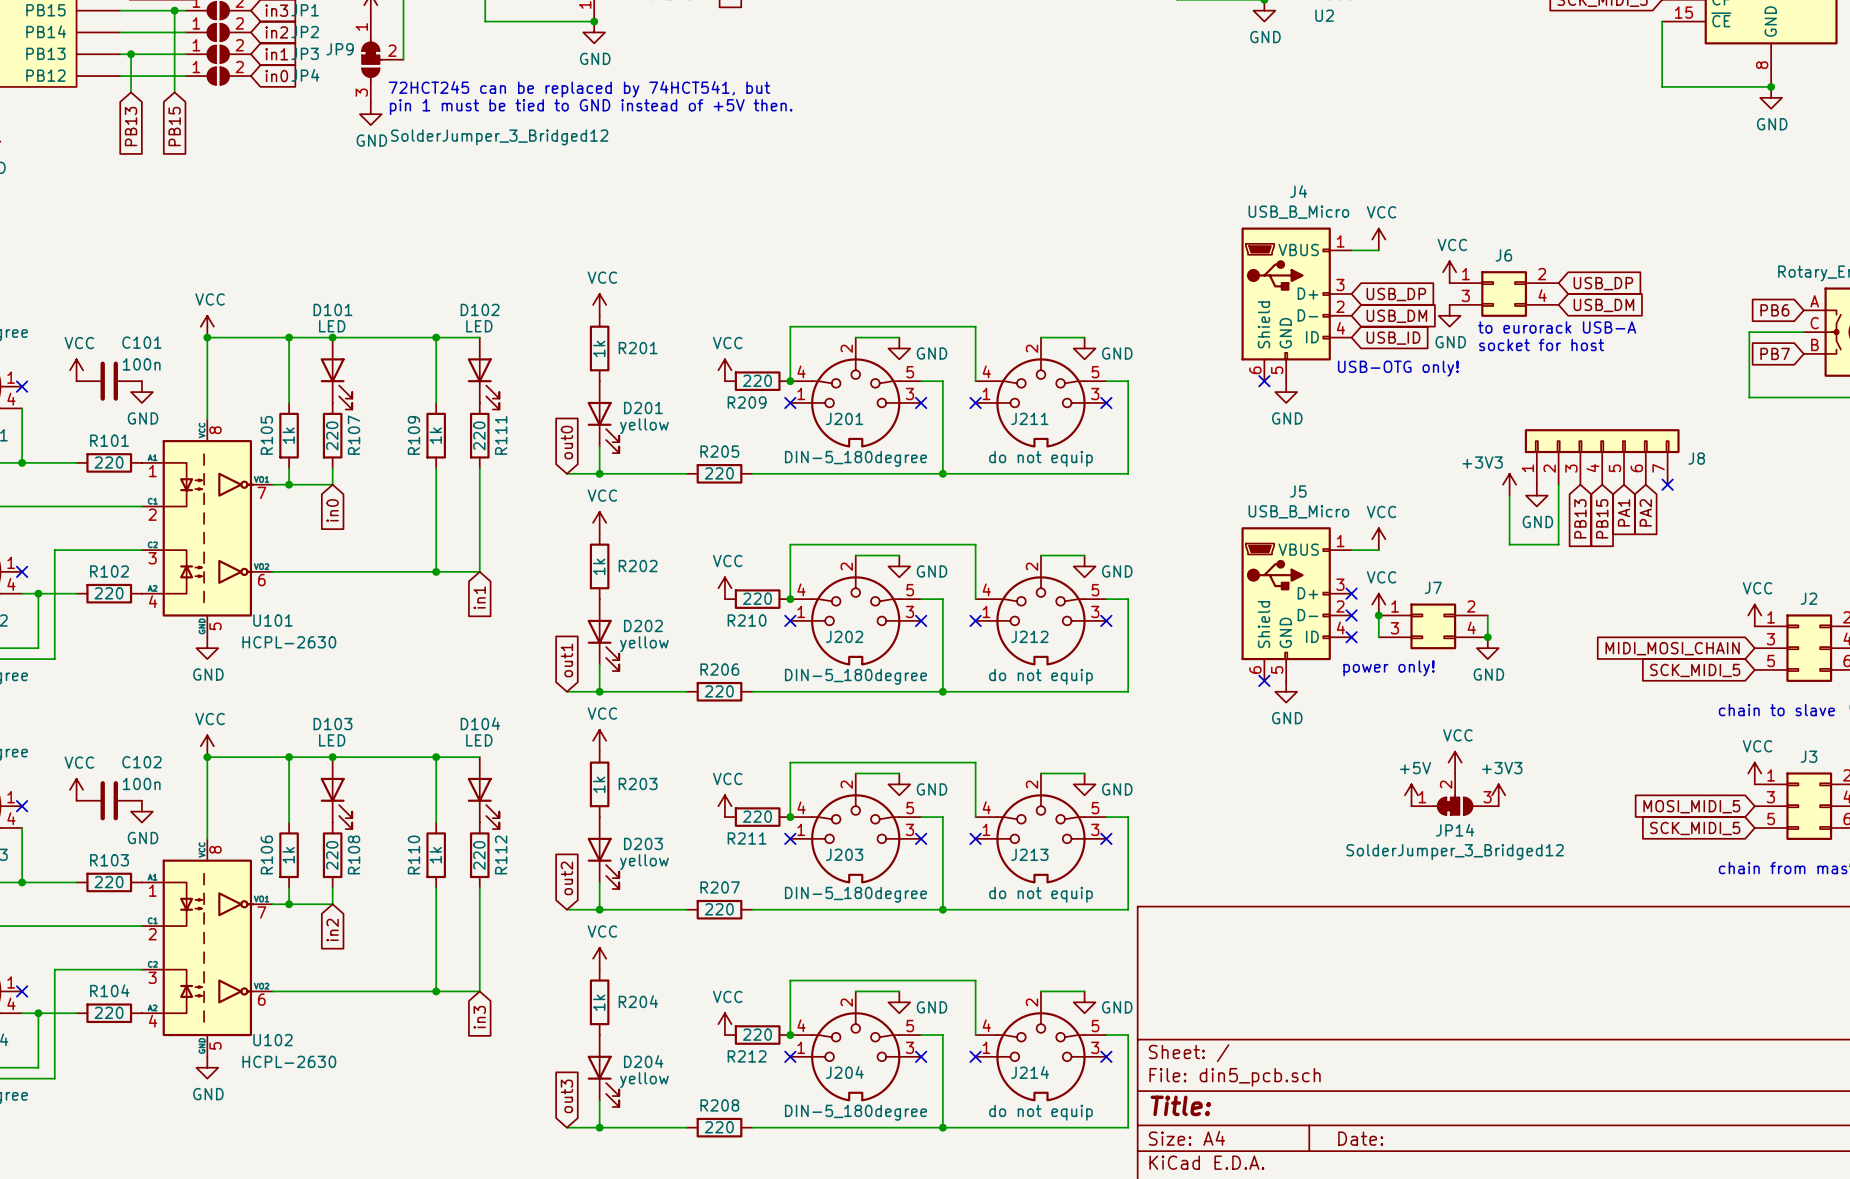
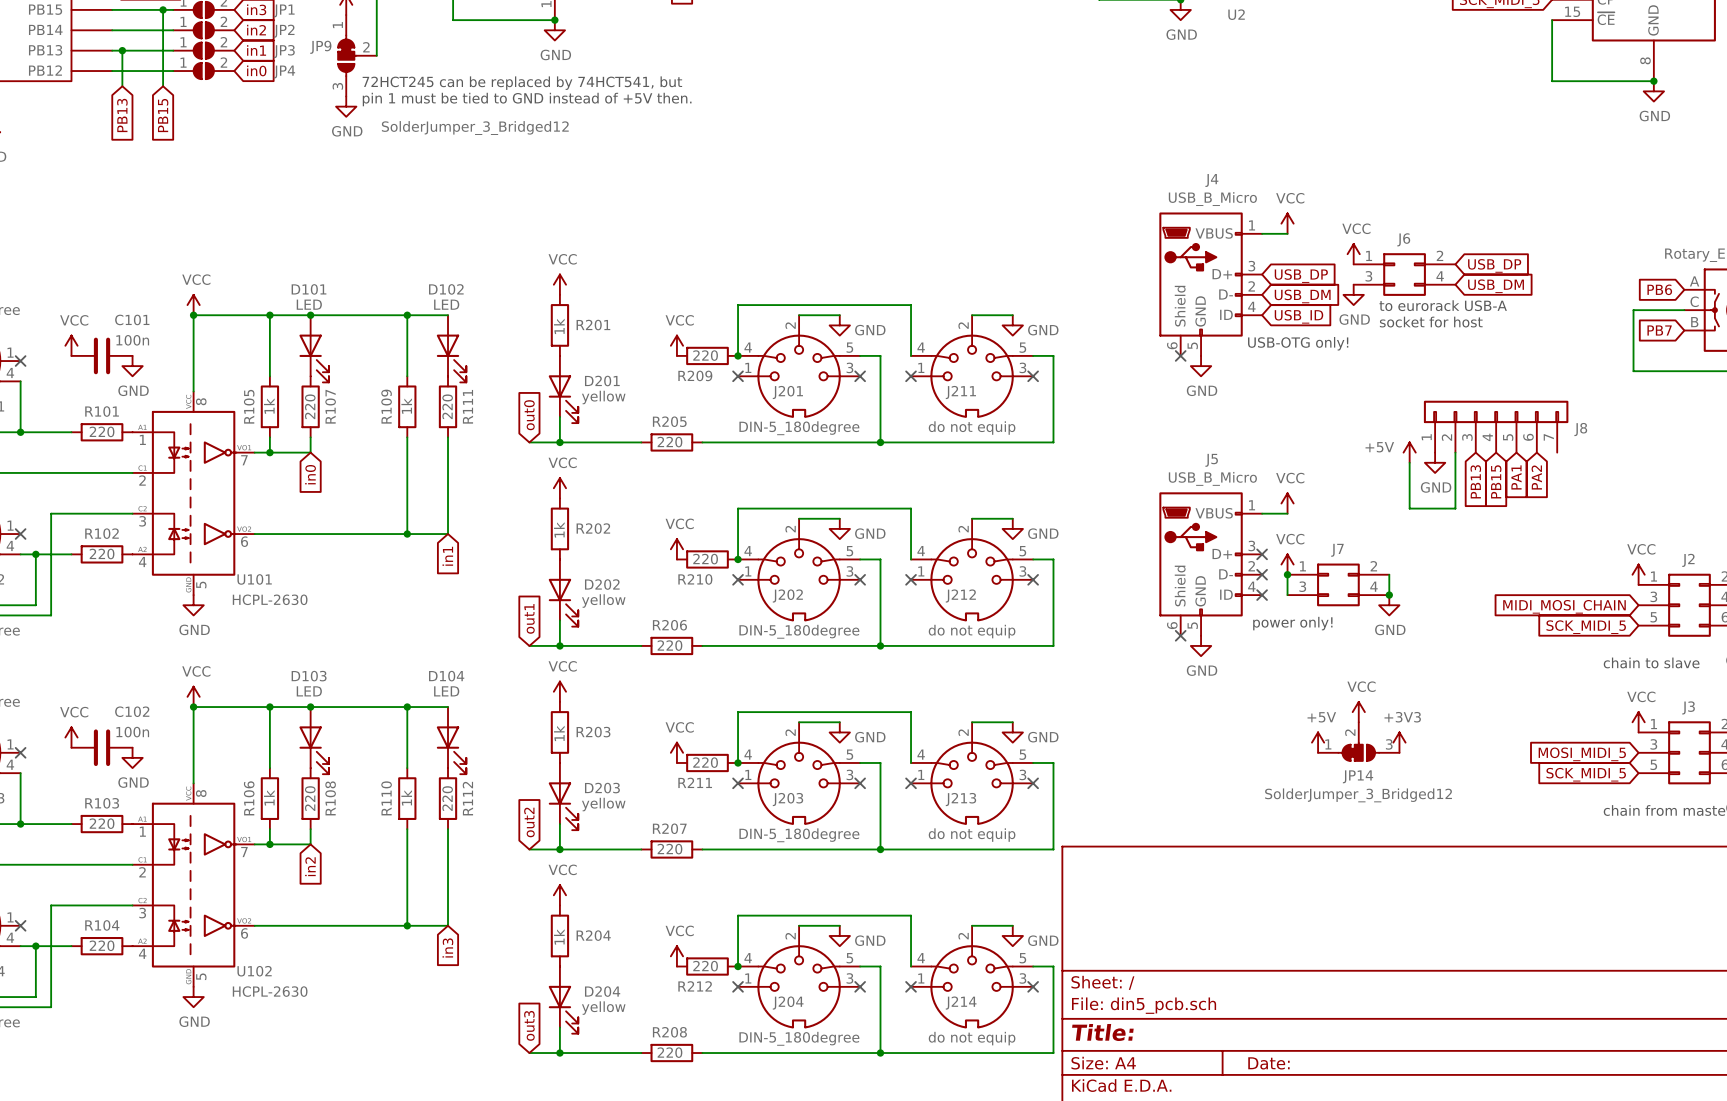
power symbol: +3V3 (1509, 484) -> +5V (1409, 452)
no-connect mark: (1667, 484) -> none

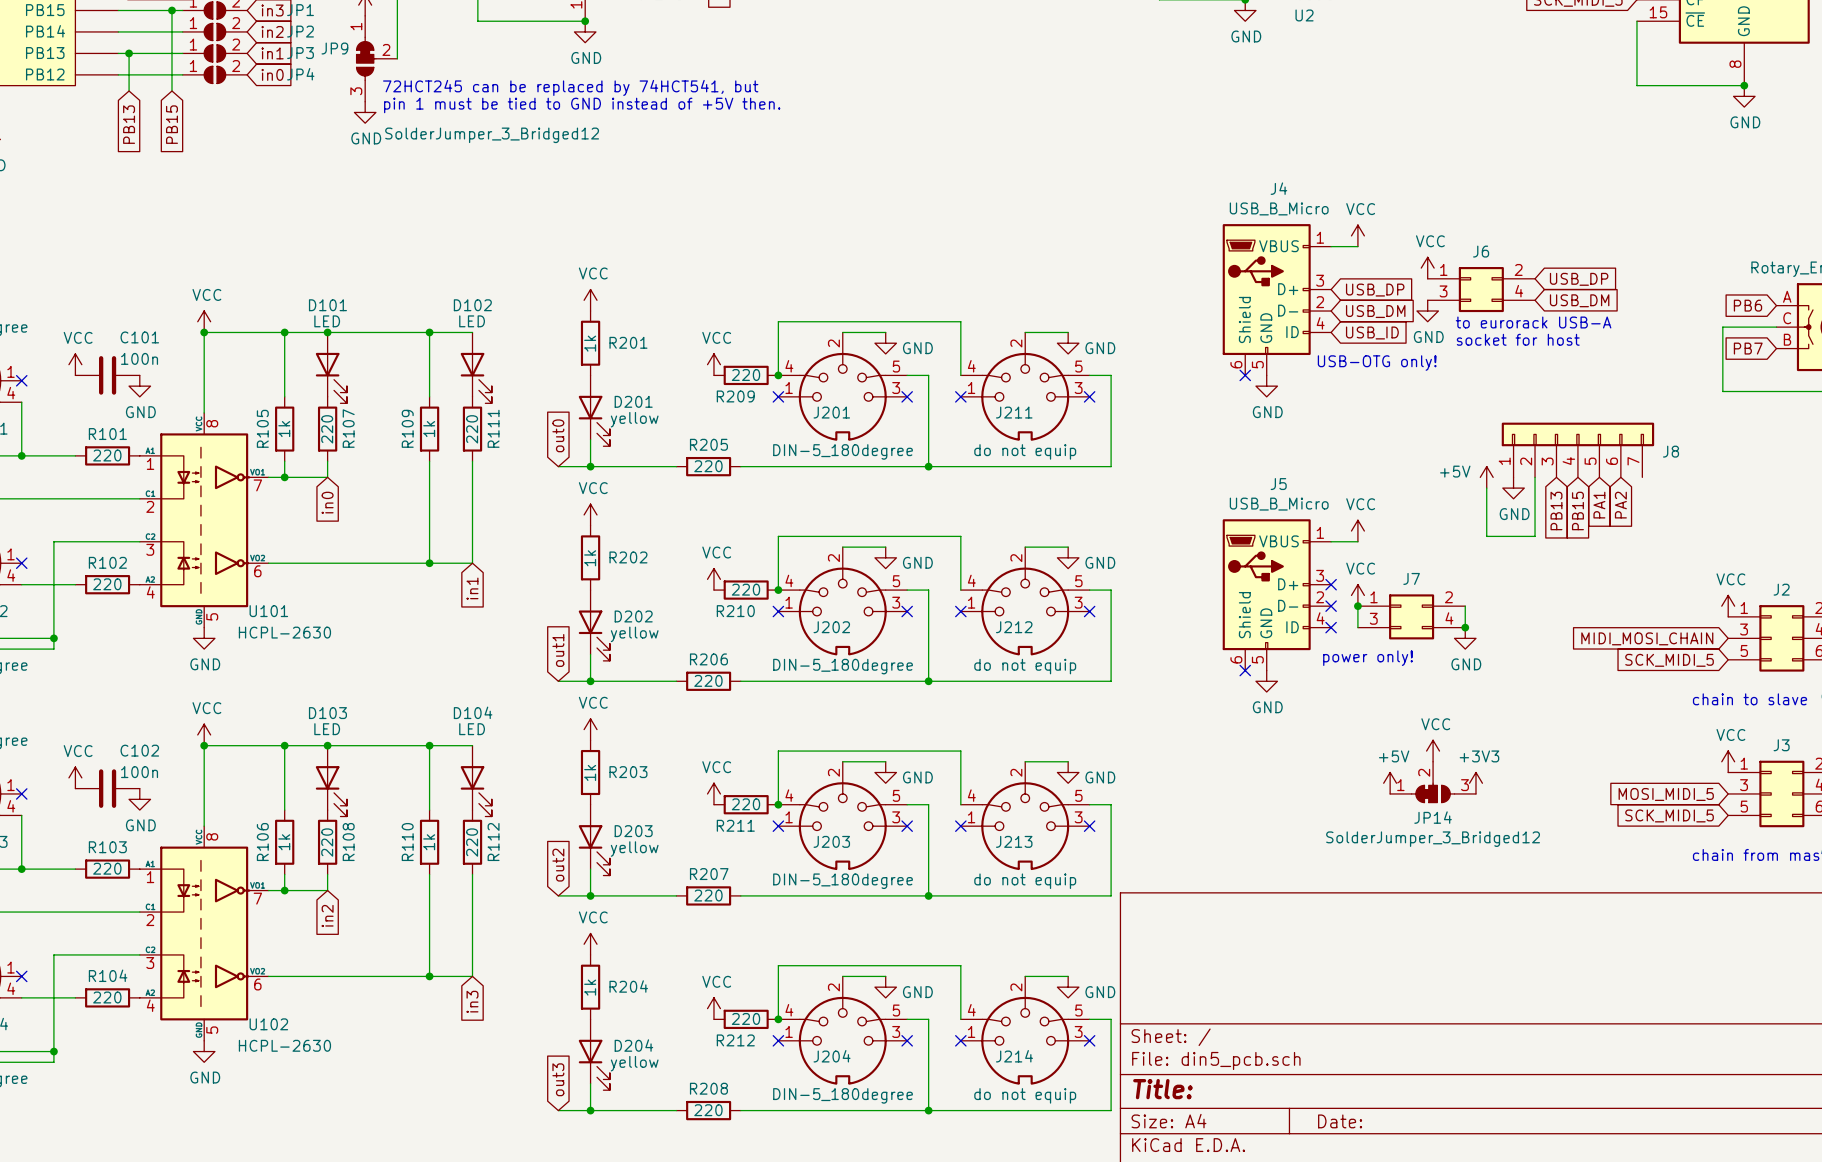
wire: (35, 554) (35, 605) -> (53, 638) (37, 638)
junction: (35, 554) -> none
junction: none -> (53, 638)
wire: (35, 946) (35, 997) -> (53, 1051) (37, 1051)
junction: (35, 946) -> none
junction: none -> (53, 1051)

